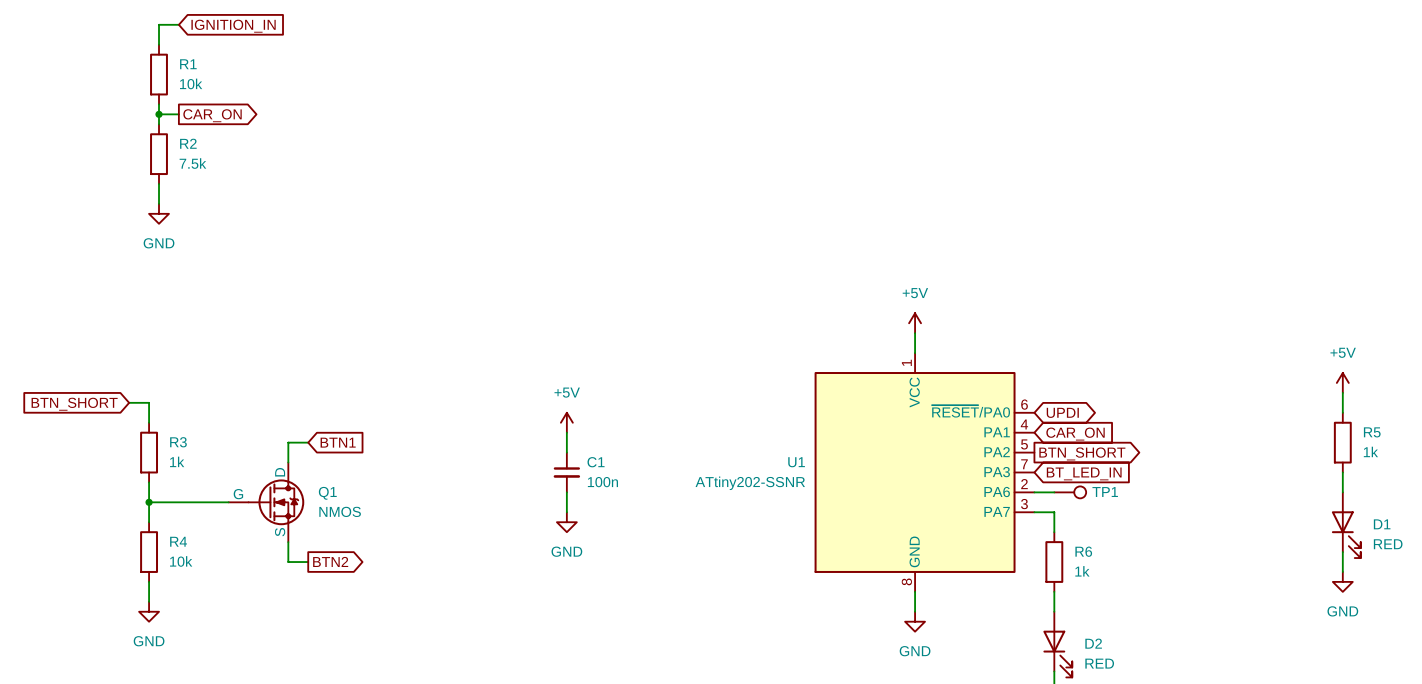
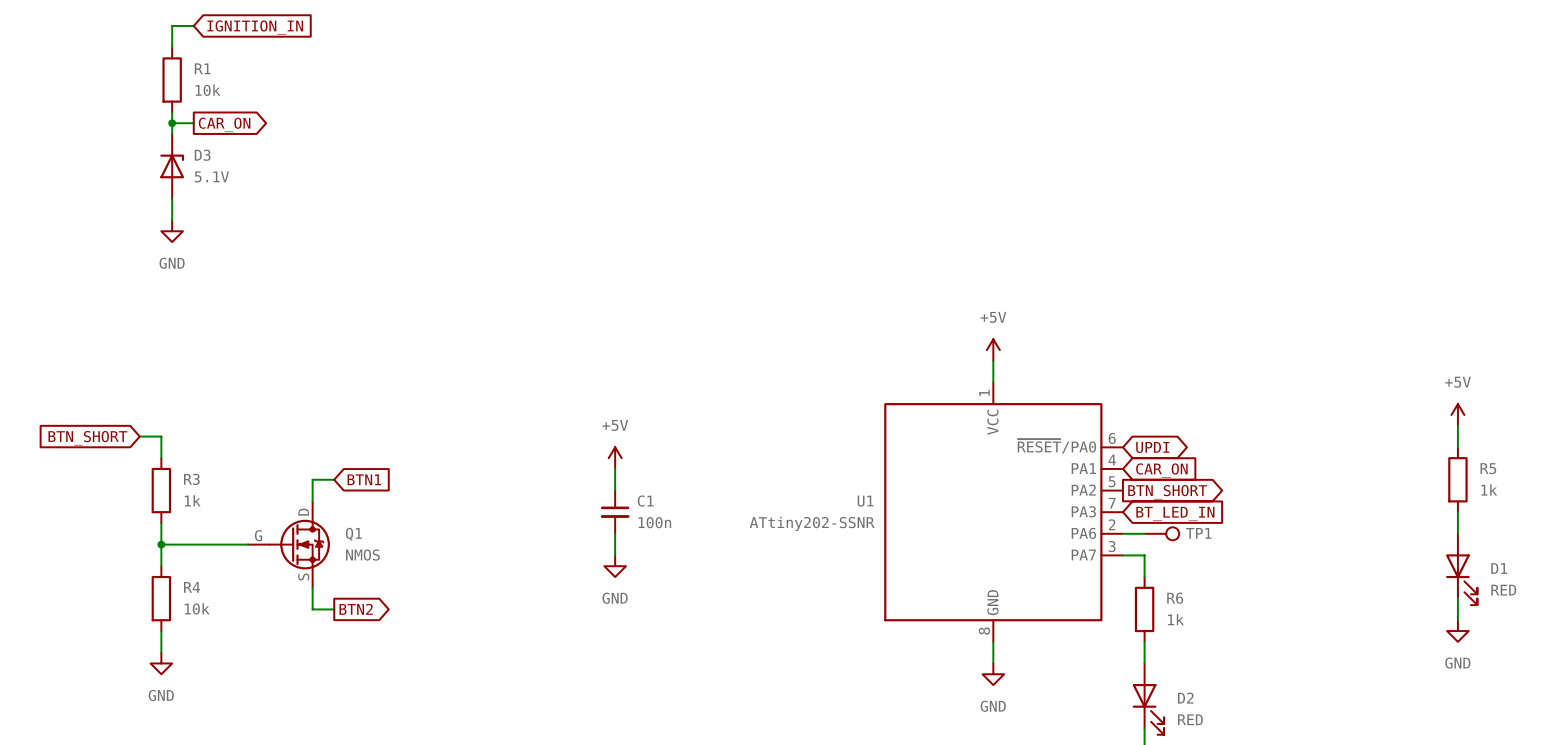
R2: 7.5k (159, 154) -> none
D3: none -> 5.1V (172, 166)

